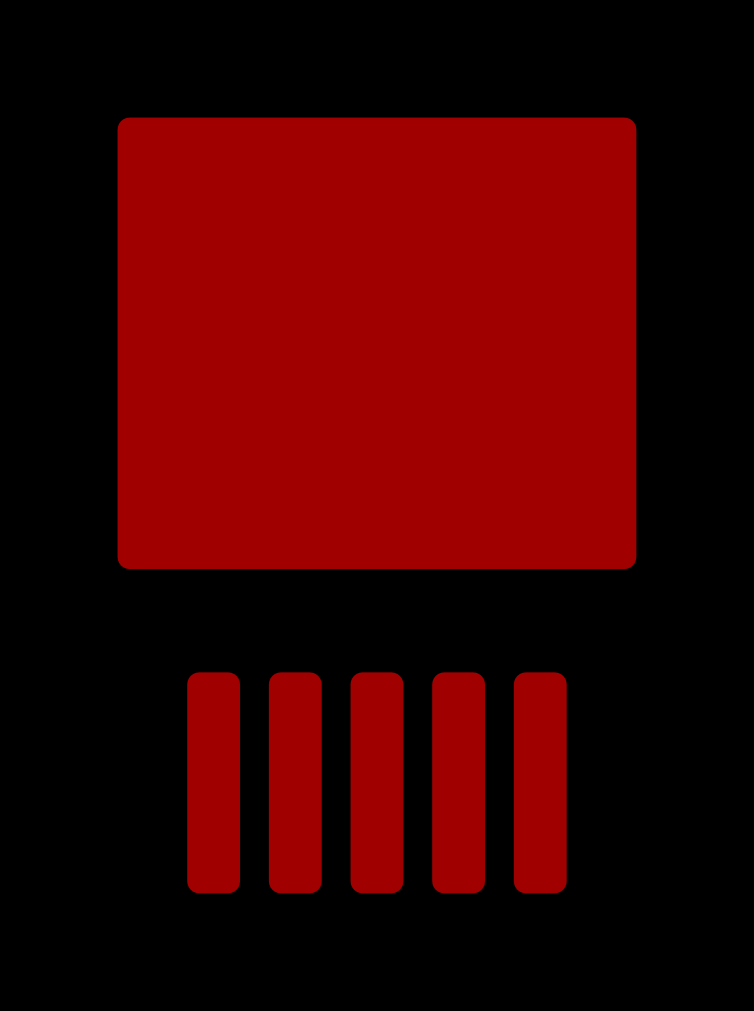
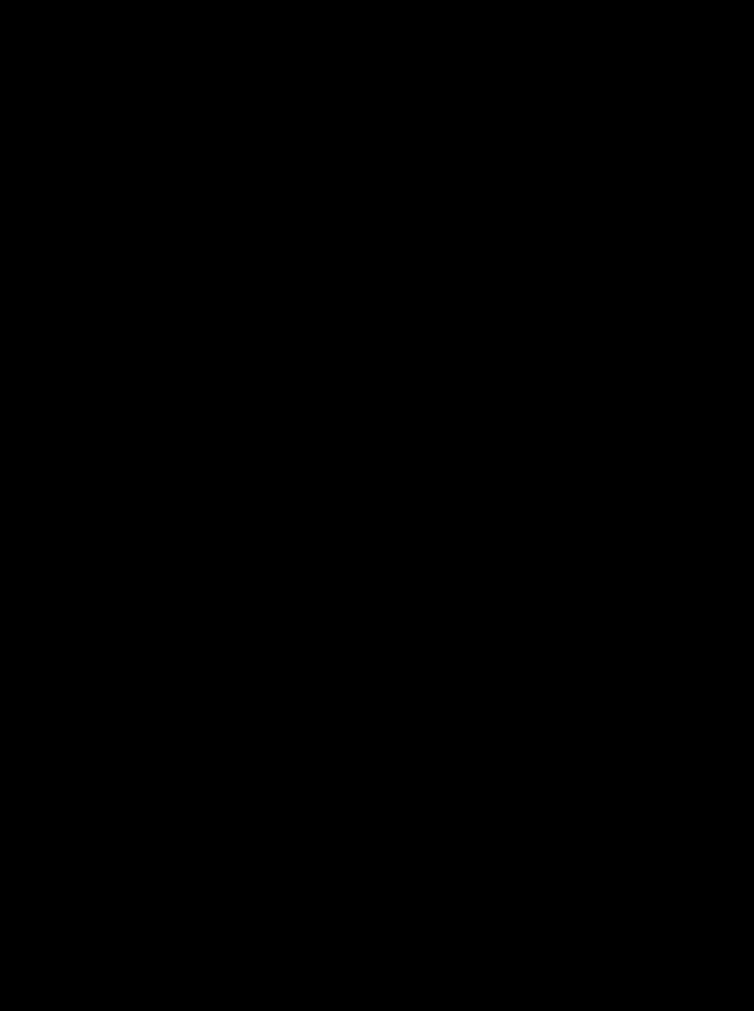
part: (376, 505) -> none

